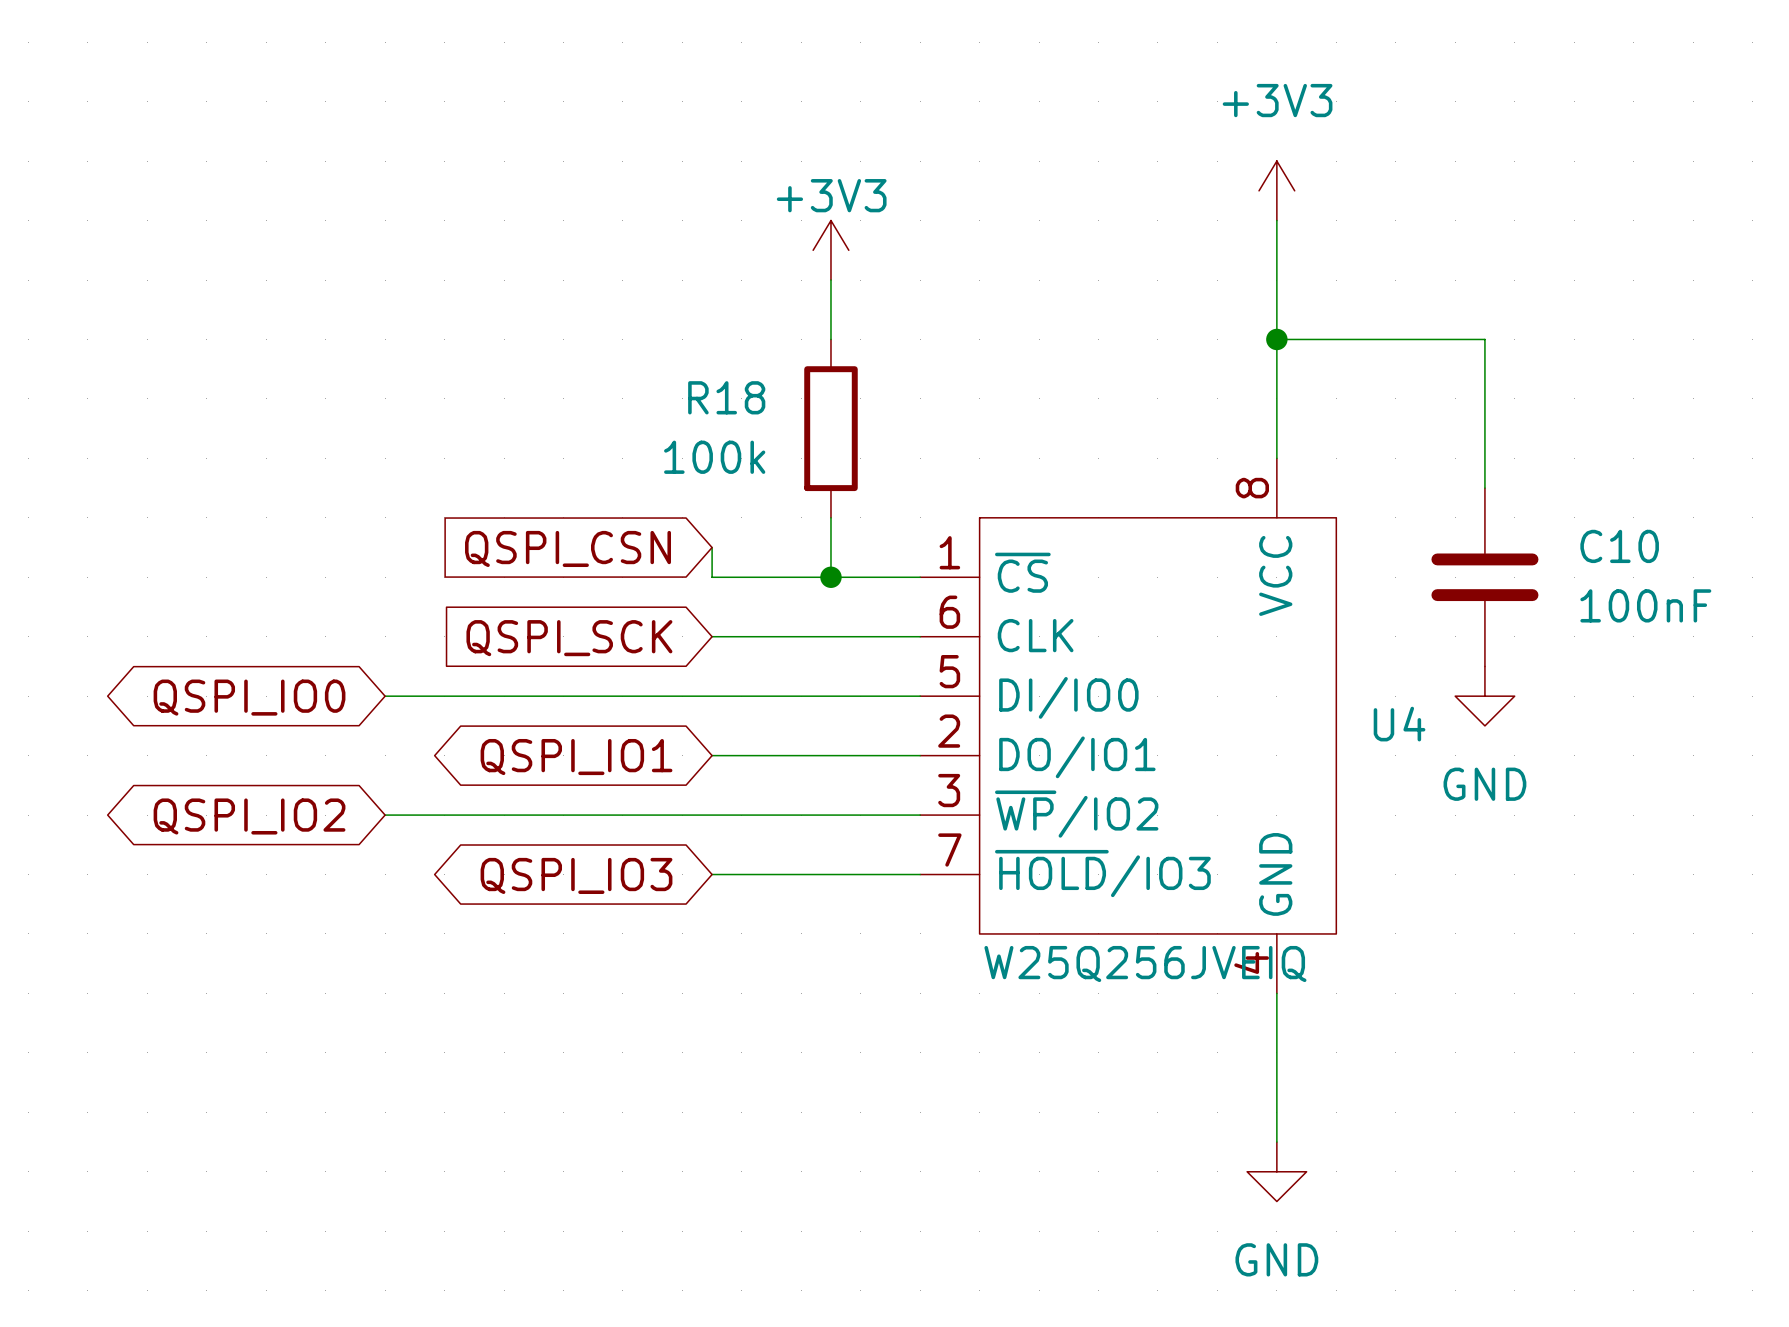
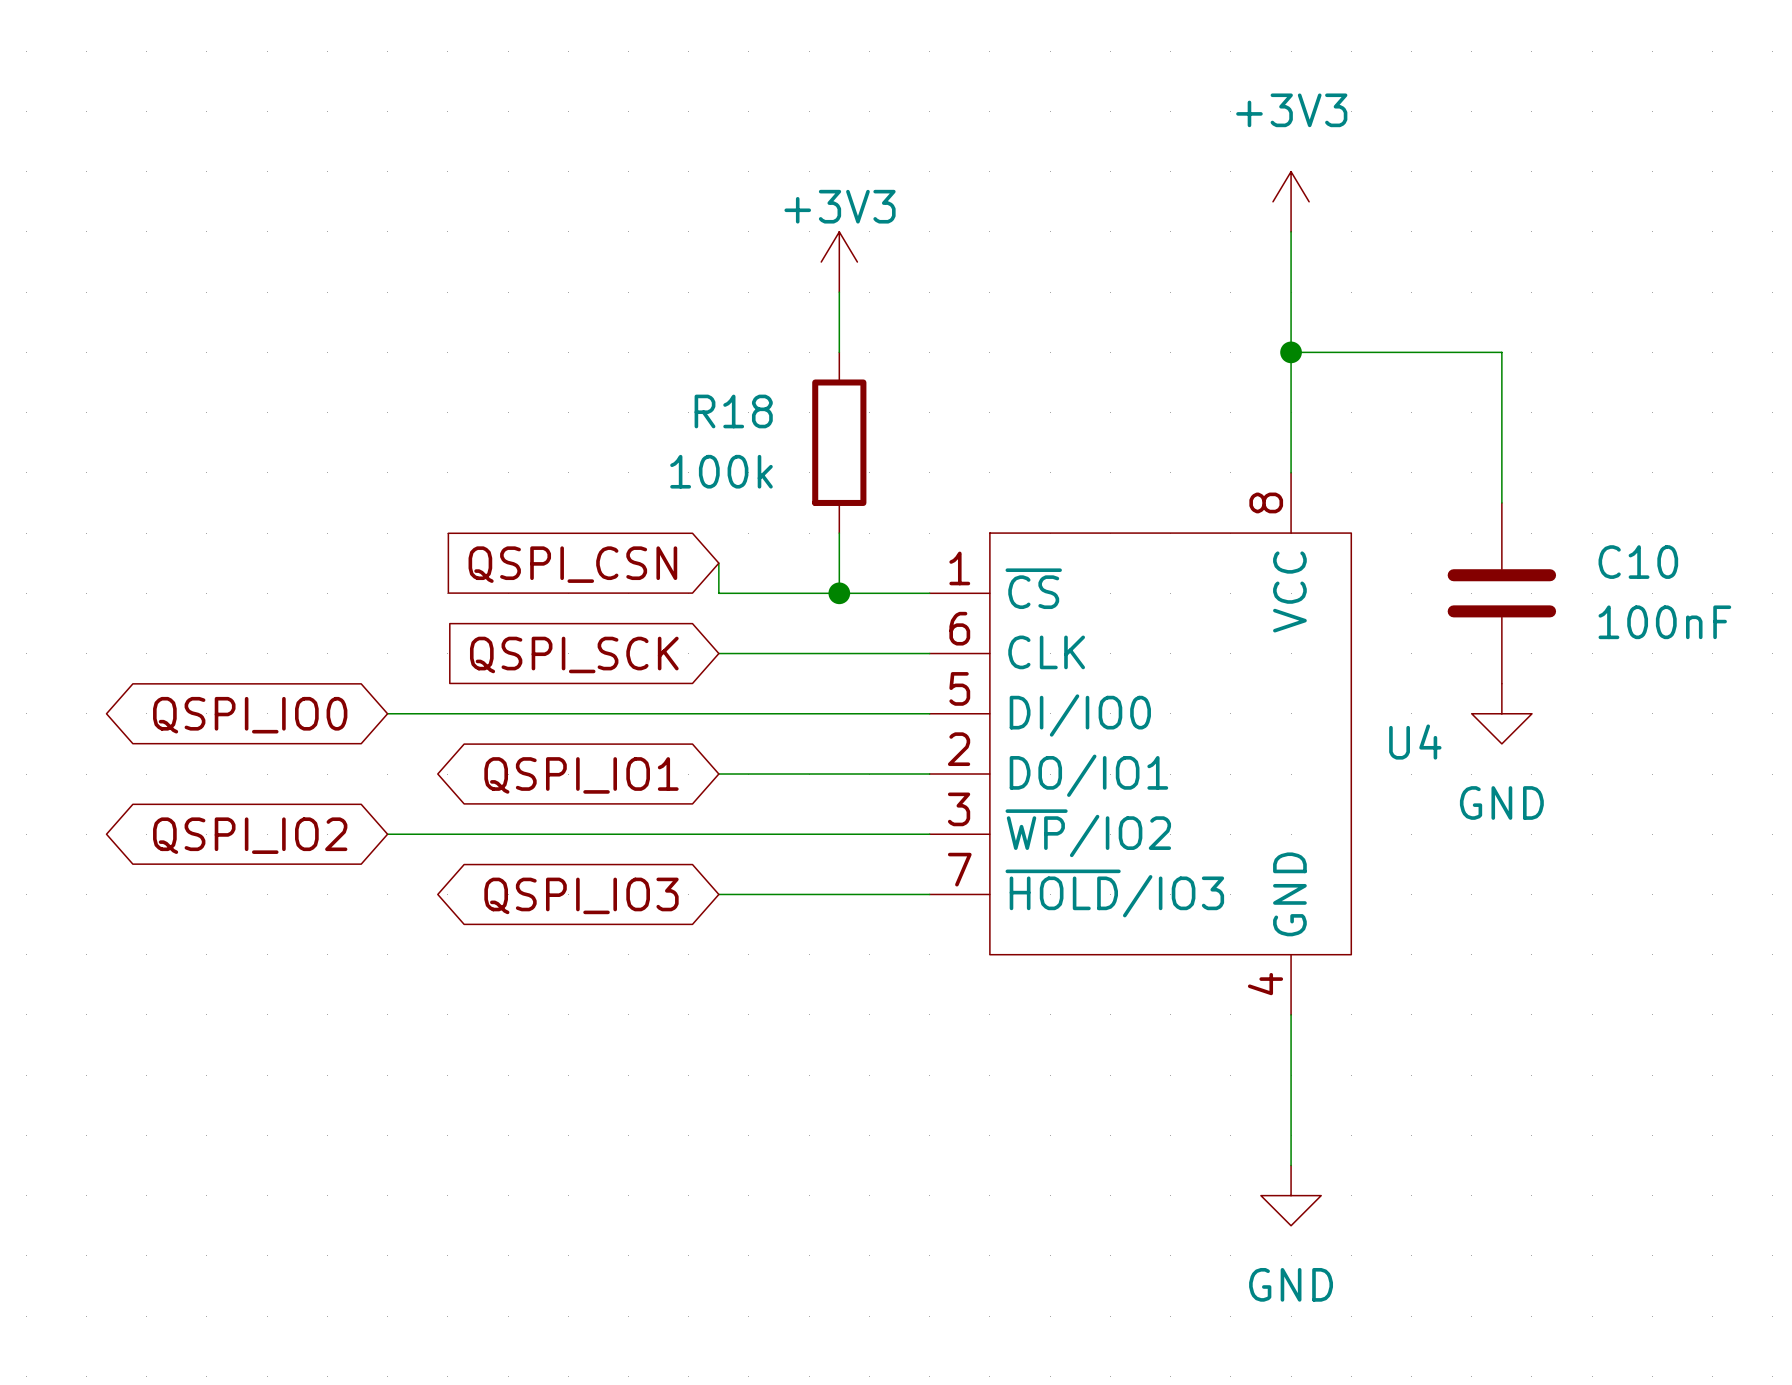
U4 value: W25Q256JVEIQ (1145, 964) -> none

